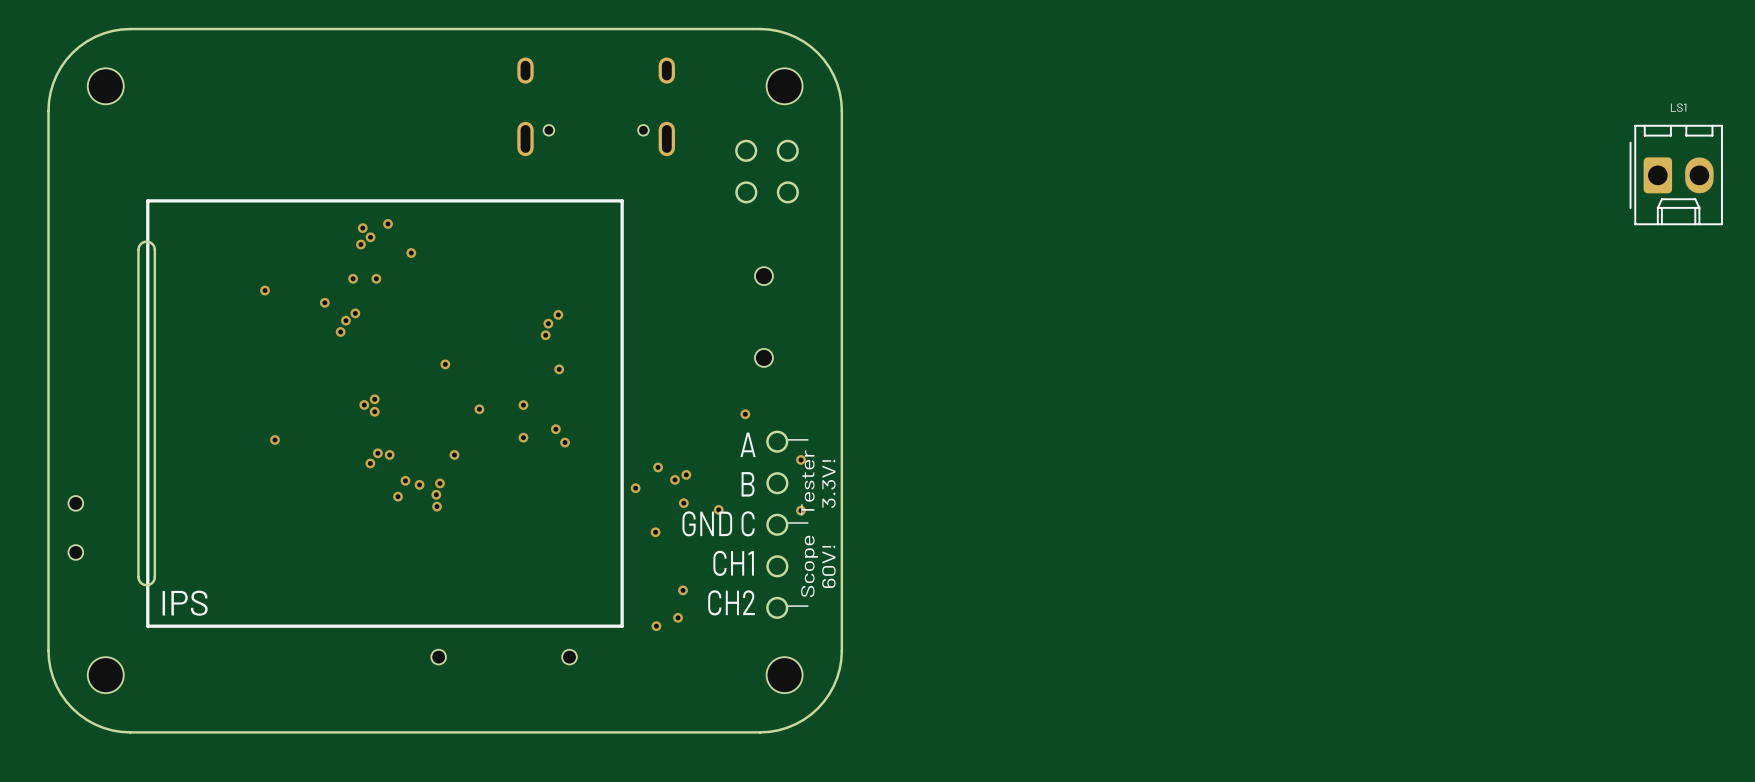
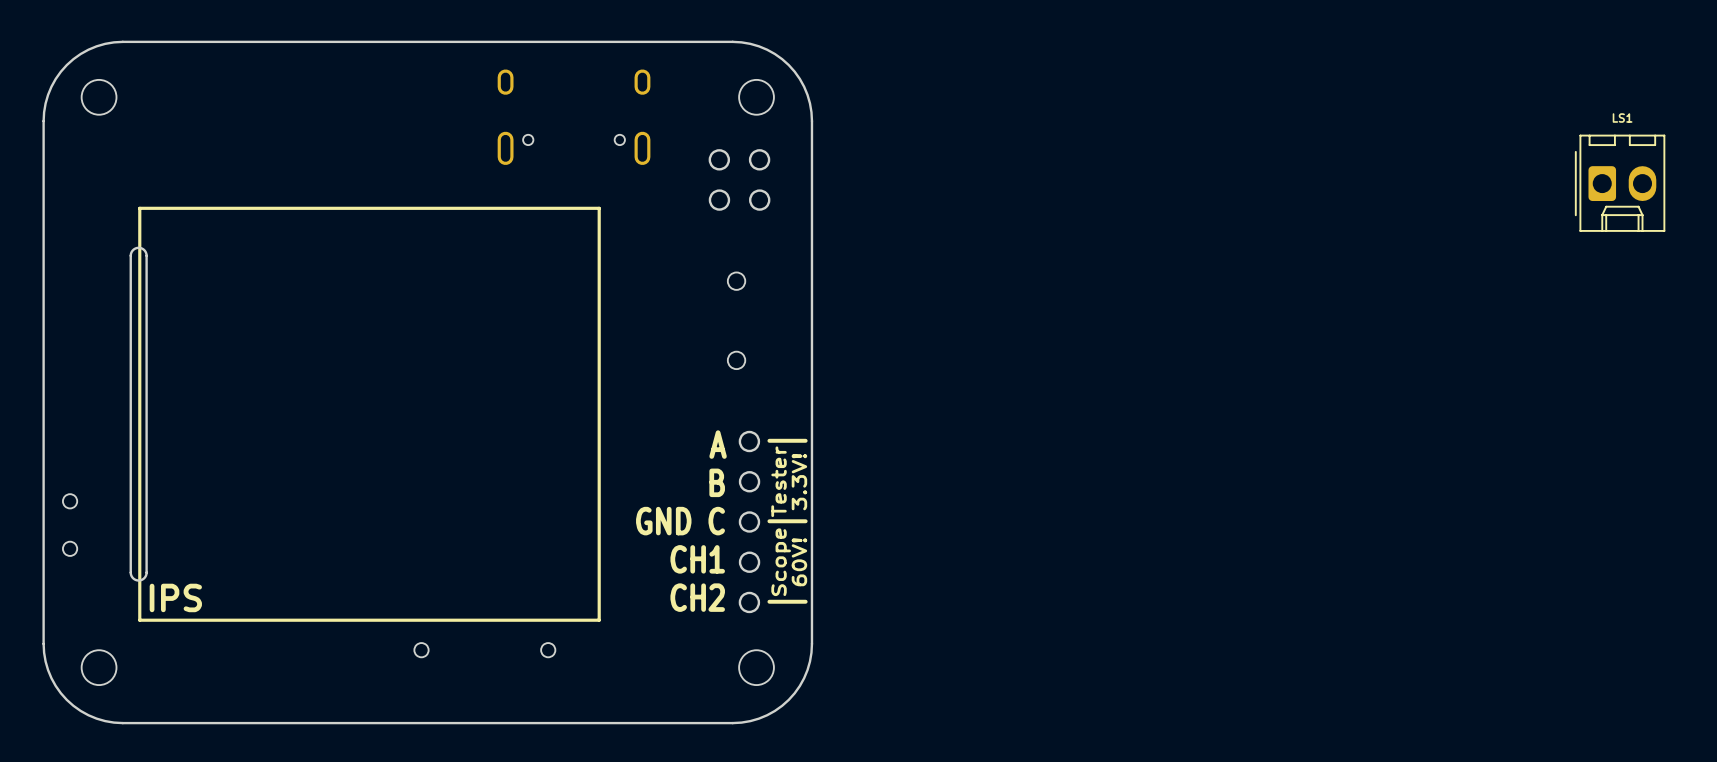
via: (388, 223) -> none
via: (362, 228) -> none
via: (370, 237) -> none
via: (360, 244) -> none
via: (411, 253) -> none
via: (353, 278) -> none
via: (376, 278) -> none
via: (265, 290) -> none
via: (324, 302) -> none
via: (355, 313) -> none
via: (558, 314) -> none
via: (345, 320) -> none
via: (548, 323) -> none
via: (340, 331) -> none
via: (545, 335) -> none
via: (445, 364) -> none
via: (559, 369) -> none
via: (374, 399) -> none
via: (364, 404) -> none
via: (523, 405) -> none
via: (479, 409) -> none
via: (374, 411) -> none
via: (745, 414) -> none
via: (555, 429) -> none
via: (523, 437) -> none
via: (274, 440) -> none
via: (565, 442) -> none
via: (377, 453) -> none
via: (389, 454) -> none
via: (454, 454) -> none
via: (800, 459) -> none
via: (370, 463) -> none
via: (658, 467) -> none
via: (686, 474) -> none
via: (674, 479) -> none
via: (405, 480) -> none
via: (439, 483) -> none
via: (419, 484) -> none
via: (635, 488) -> none
via: (436, 494) -> none
via: (397, 496) -> none
via: (683, 503) -> none
via: (437, 506) -> none
via: (718, 509) -> none
via: (800, 510) -> none
via: (655, 532) -> none
via: (683, 590) -> none
via: (678, 617) -> none
via: (656, 626) -> none

